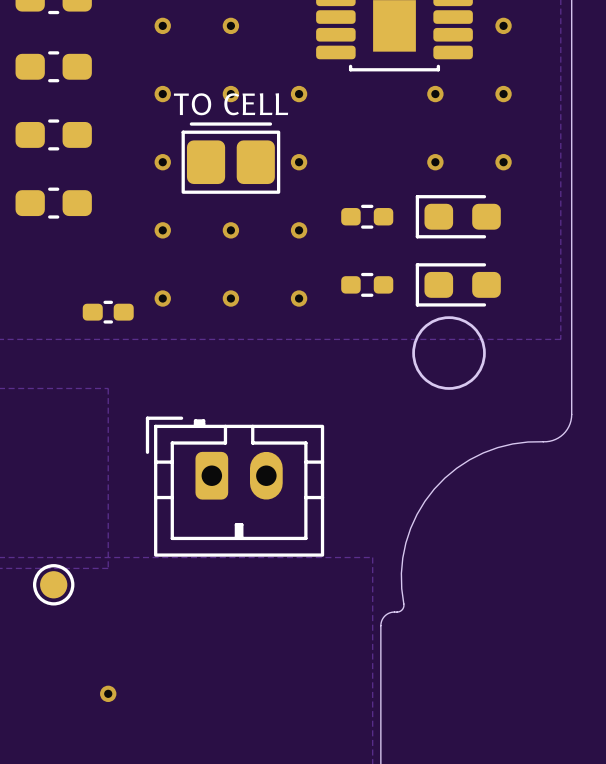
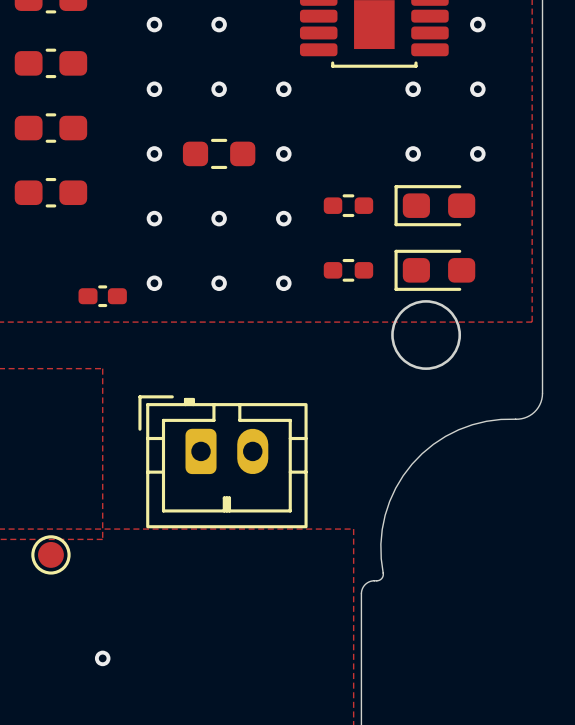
part footprint: [181, 122, 281, 194] -> [182, 138, 256, 169]

